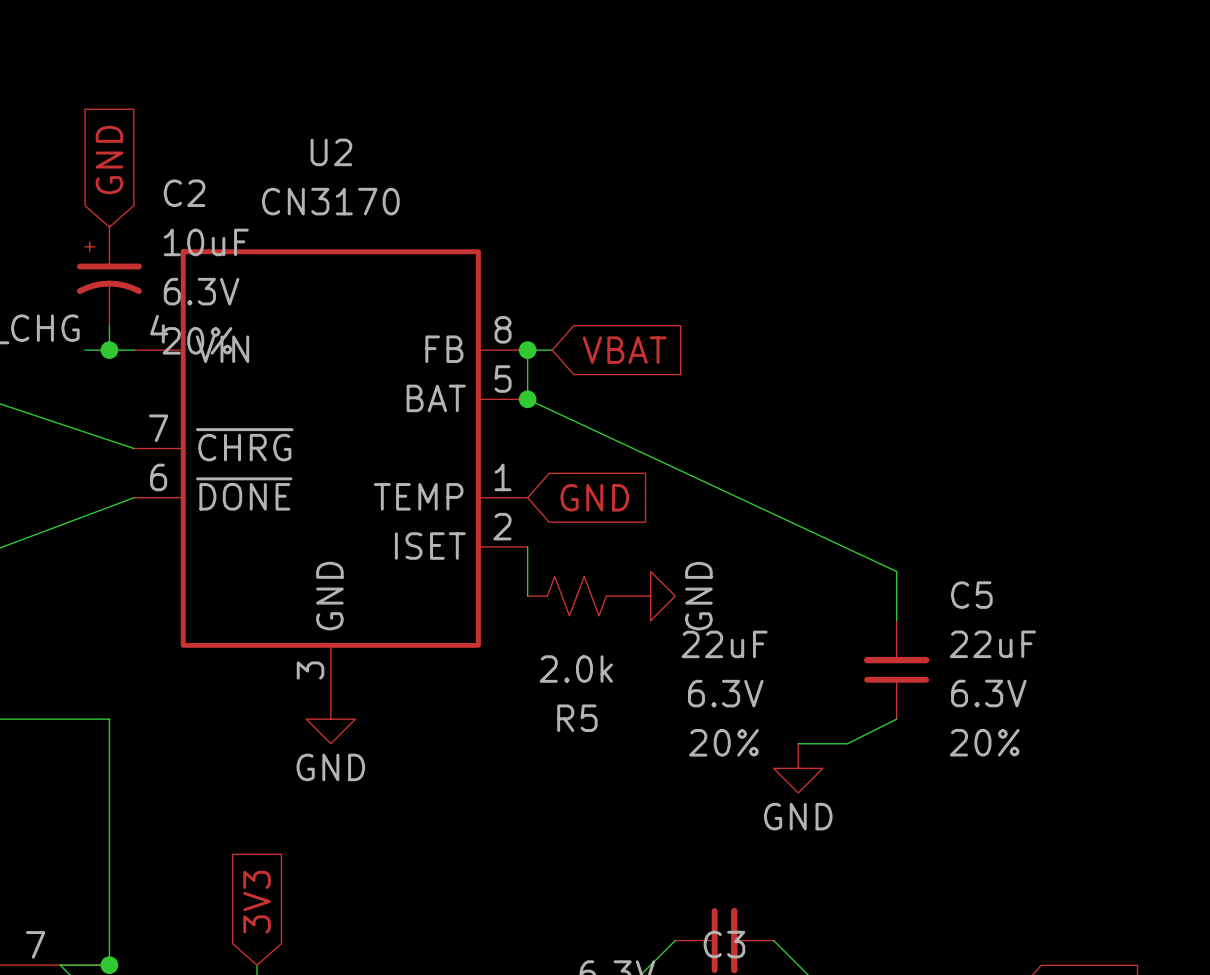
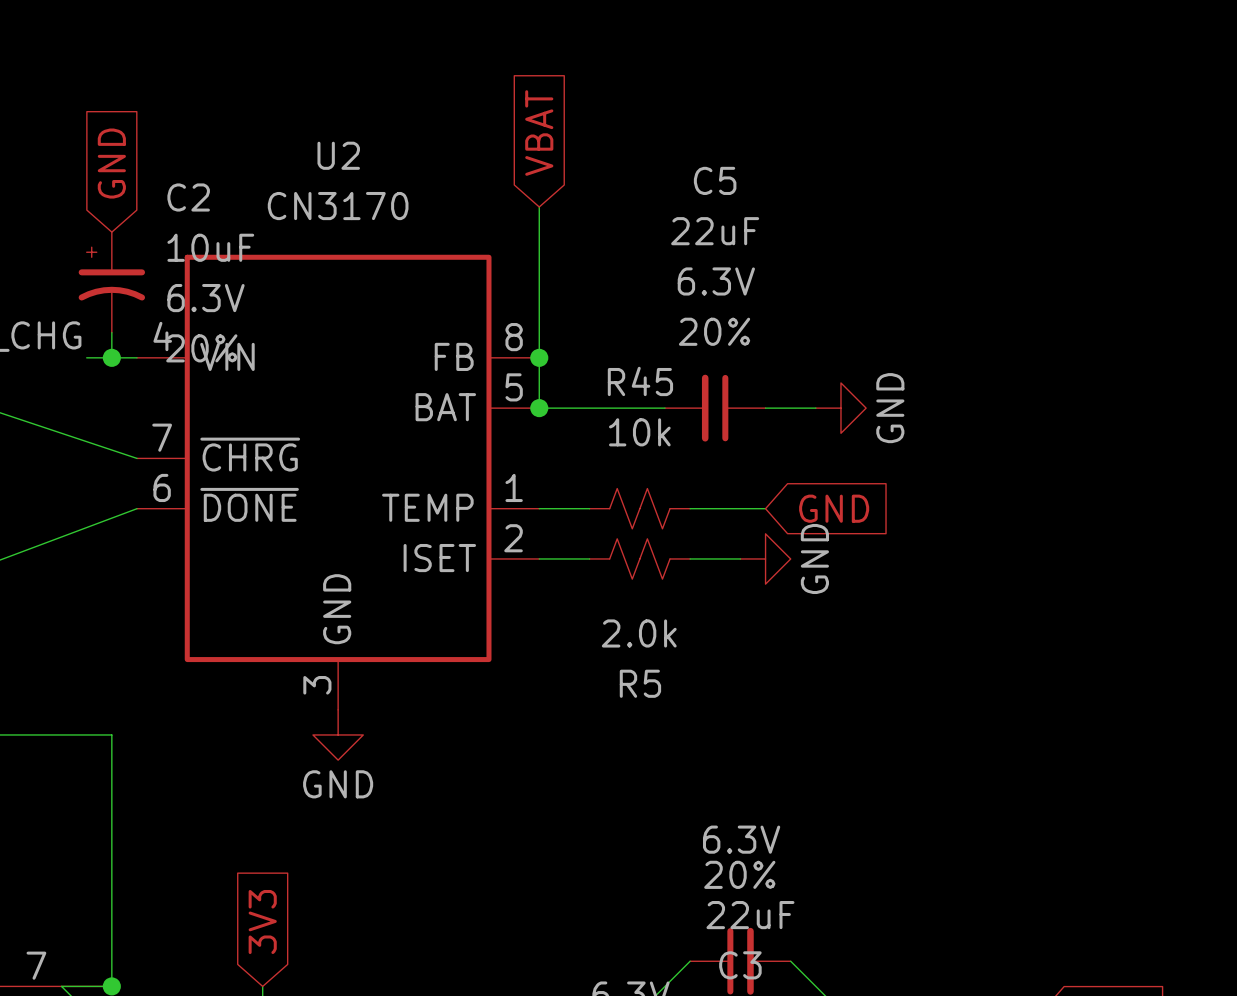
wire: (527, 350) (552, 350) -> (539, 357) (539, 206)
global label rotation: 0° (624, 350) -> 90° counterclockwise (539, 133)
global label position: VBAT (624, 350) -> VBAT (539, 133)
wire: (527, 399) (896, 571) (896, 620) -> (539, 408) (664, 408)
wire: none -> (765, 408) (815, 408)
power symbol: none -> GND (840, 408)
wire: none -> (539, 508) (589, 508)
global label position: GND (594, 497) -> GND (834, 508)
R45: none -> 10k (639, 508)
wire: none -> (690, 508) (765, 508)
wire: (527, 546) (527, 596) -> (539, 558) (589, 558)
wire: none -> (690, 558) (740, 558)
C5 name position: C5 (971, 595) -> C5 (715, 180)
R5 position: (576, 596) -> (639, 558)
power symbol position: GND (650, 596) -> GND (765, 558)
C3 value position: 22uF (724, 644) -> 22uF (750, 915)
C5 value position: 22uF (992, 644) -> 22uF (715, 231)
C5 rotation: 0° (896, 669) -> 90° counterclockwise (715, 408)
C5 position: (896, 669) -> (715, 408)
C3 text position: 6.3V (725, 693) -> 6.3V (741, 839)
wire: (896, 719) (847, 743) (798, 743) -> none
C3 text position: 20% (723, 742) -> 20% (739, 874)
C5 text position: 20% (984, 742) -> 20% (714, 331)
power symbol: GND (798, 768) -> none

